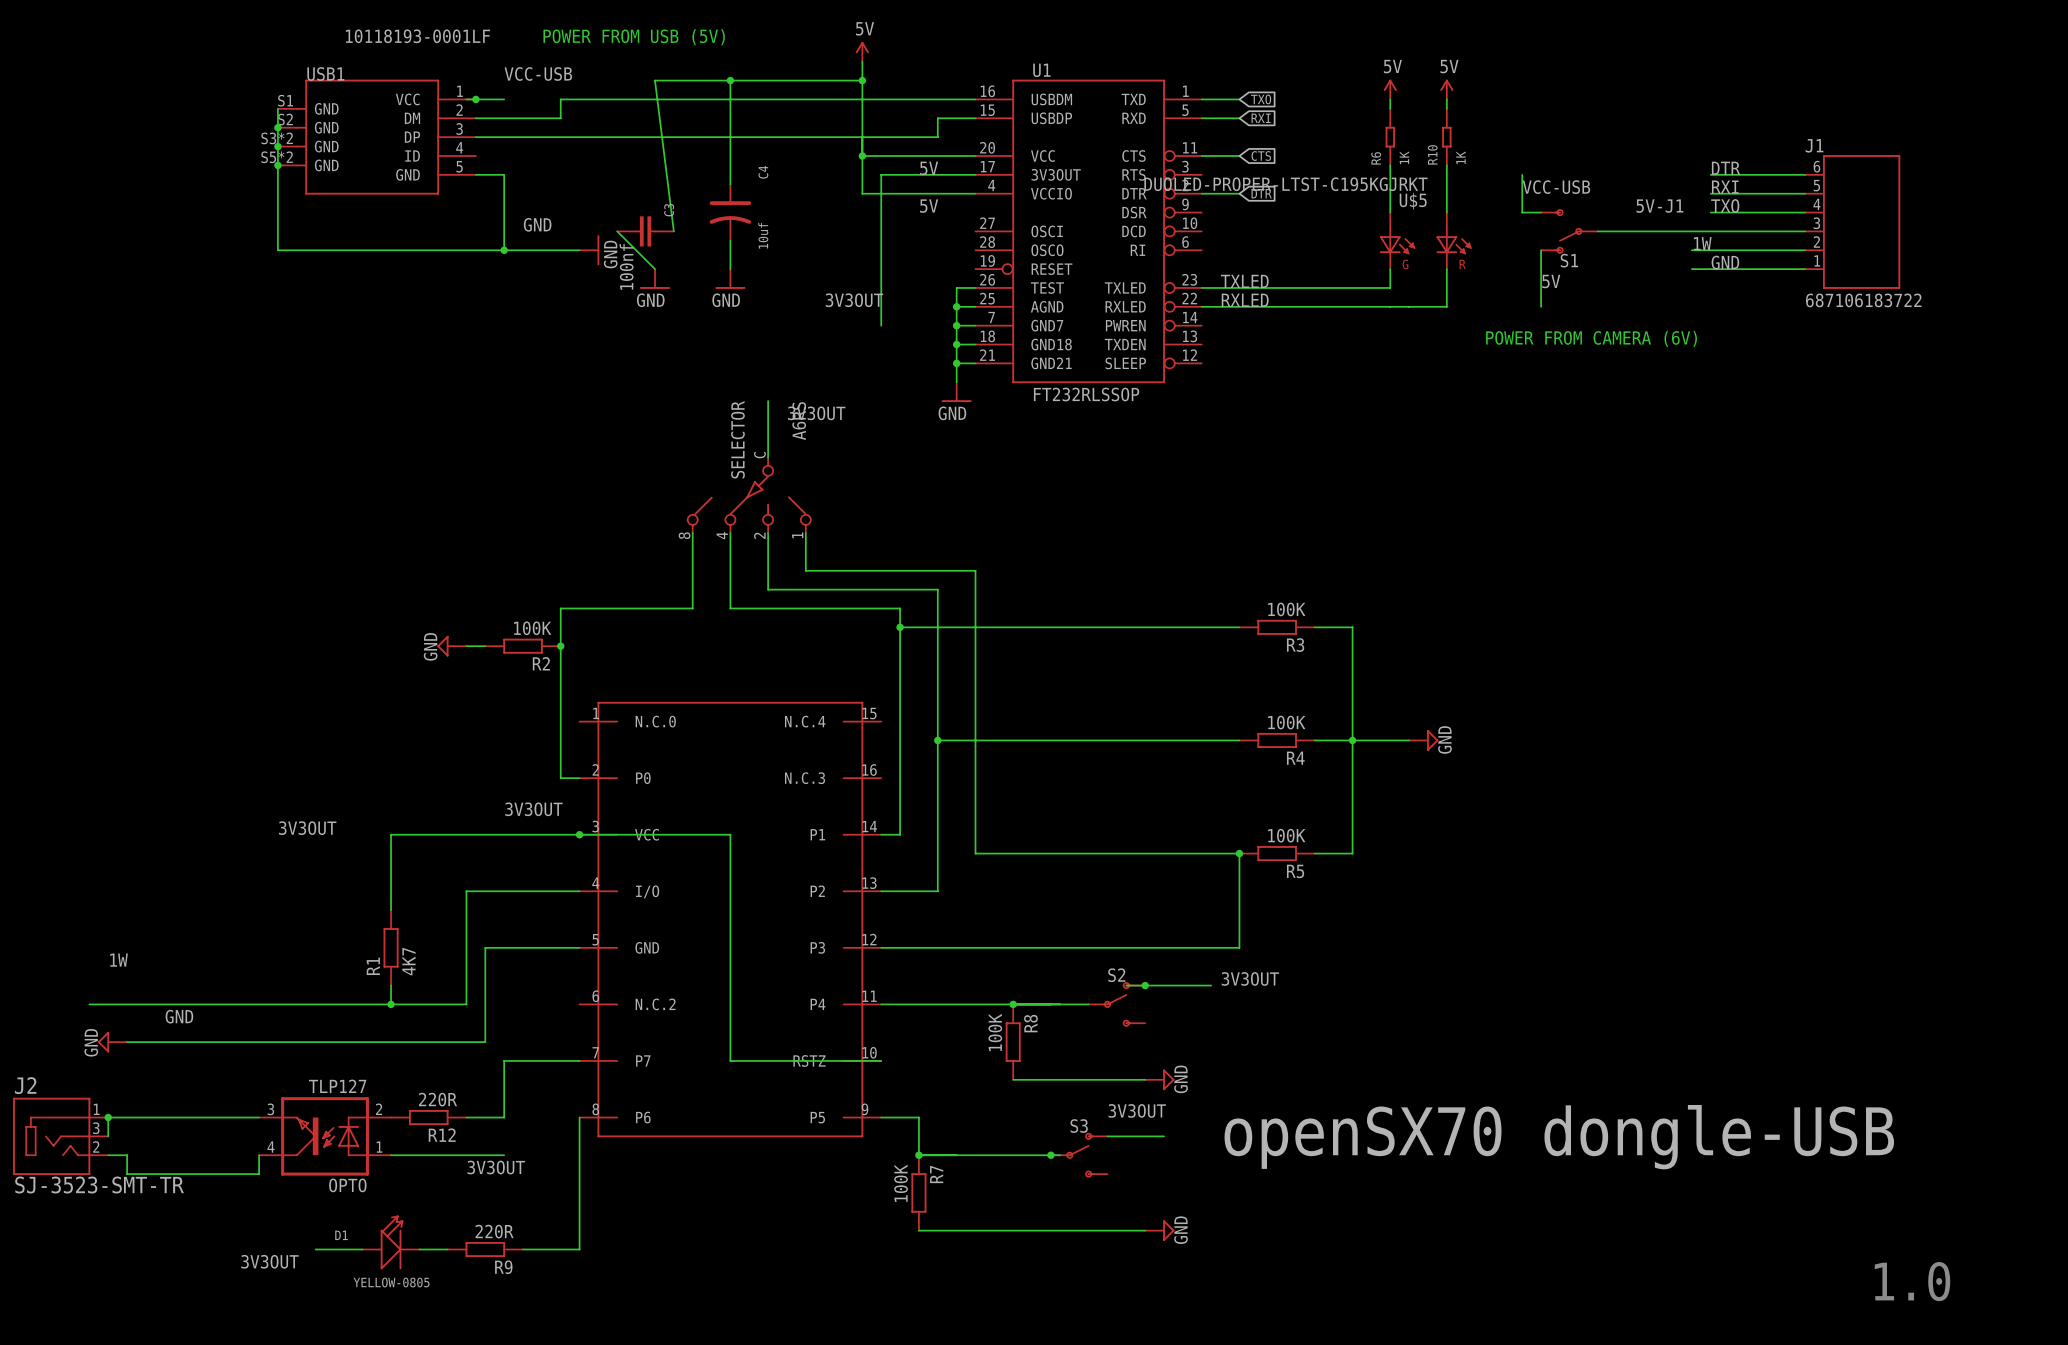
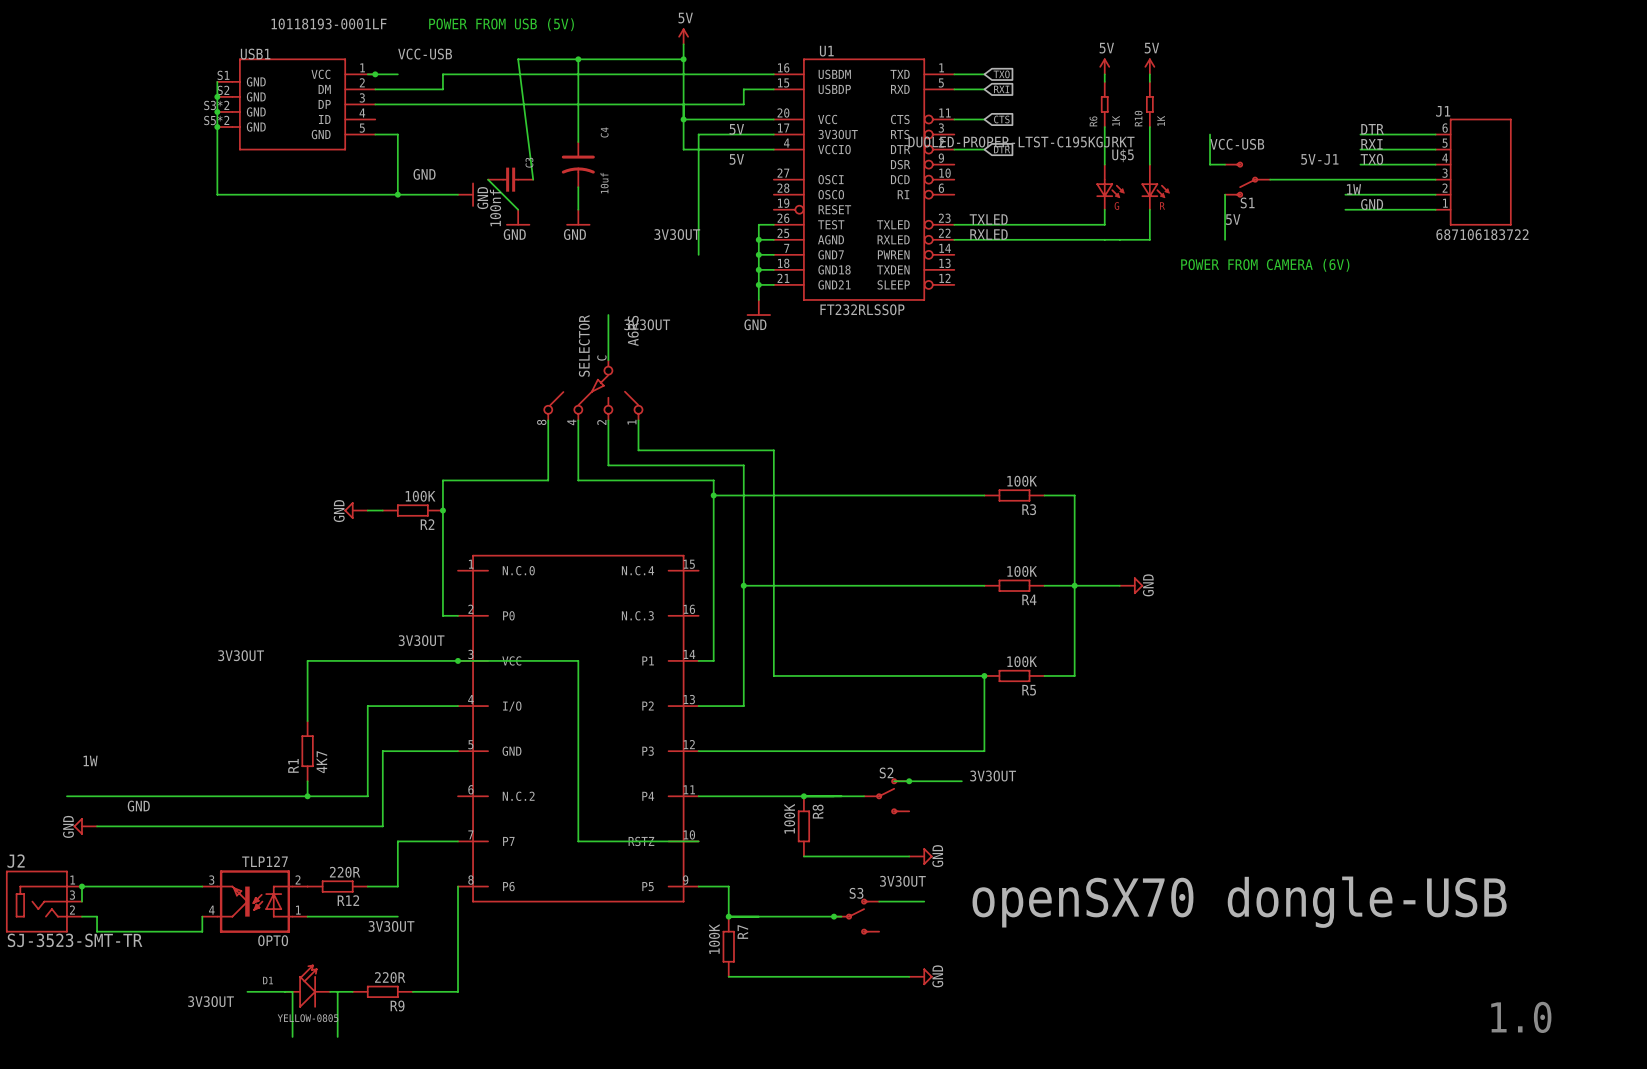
wire: none -> (285, 991) (292, 991) (292, 1036)
wire: none -> (337, 991) (337, 1036)

